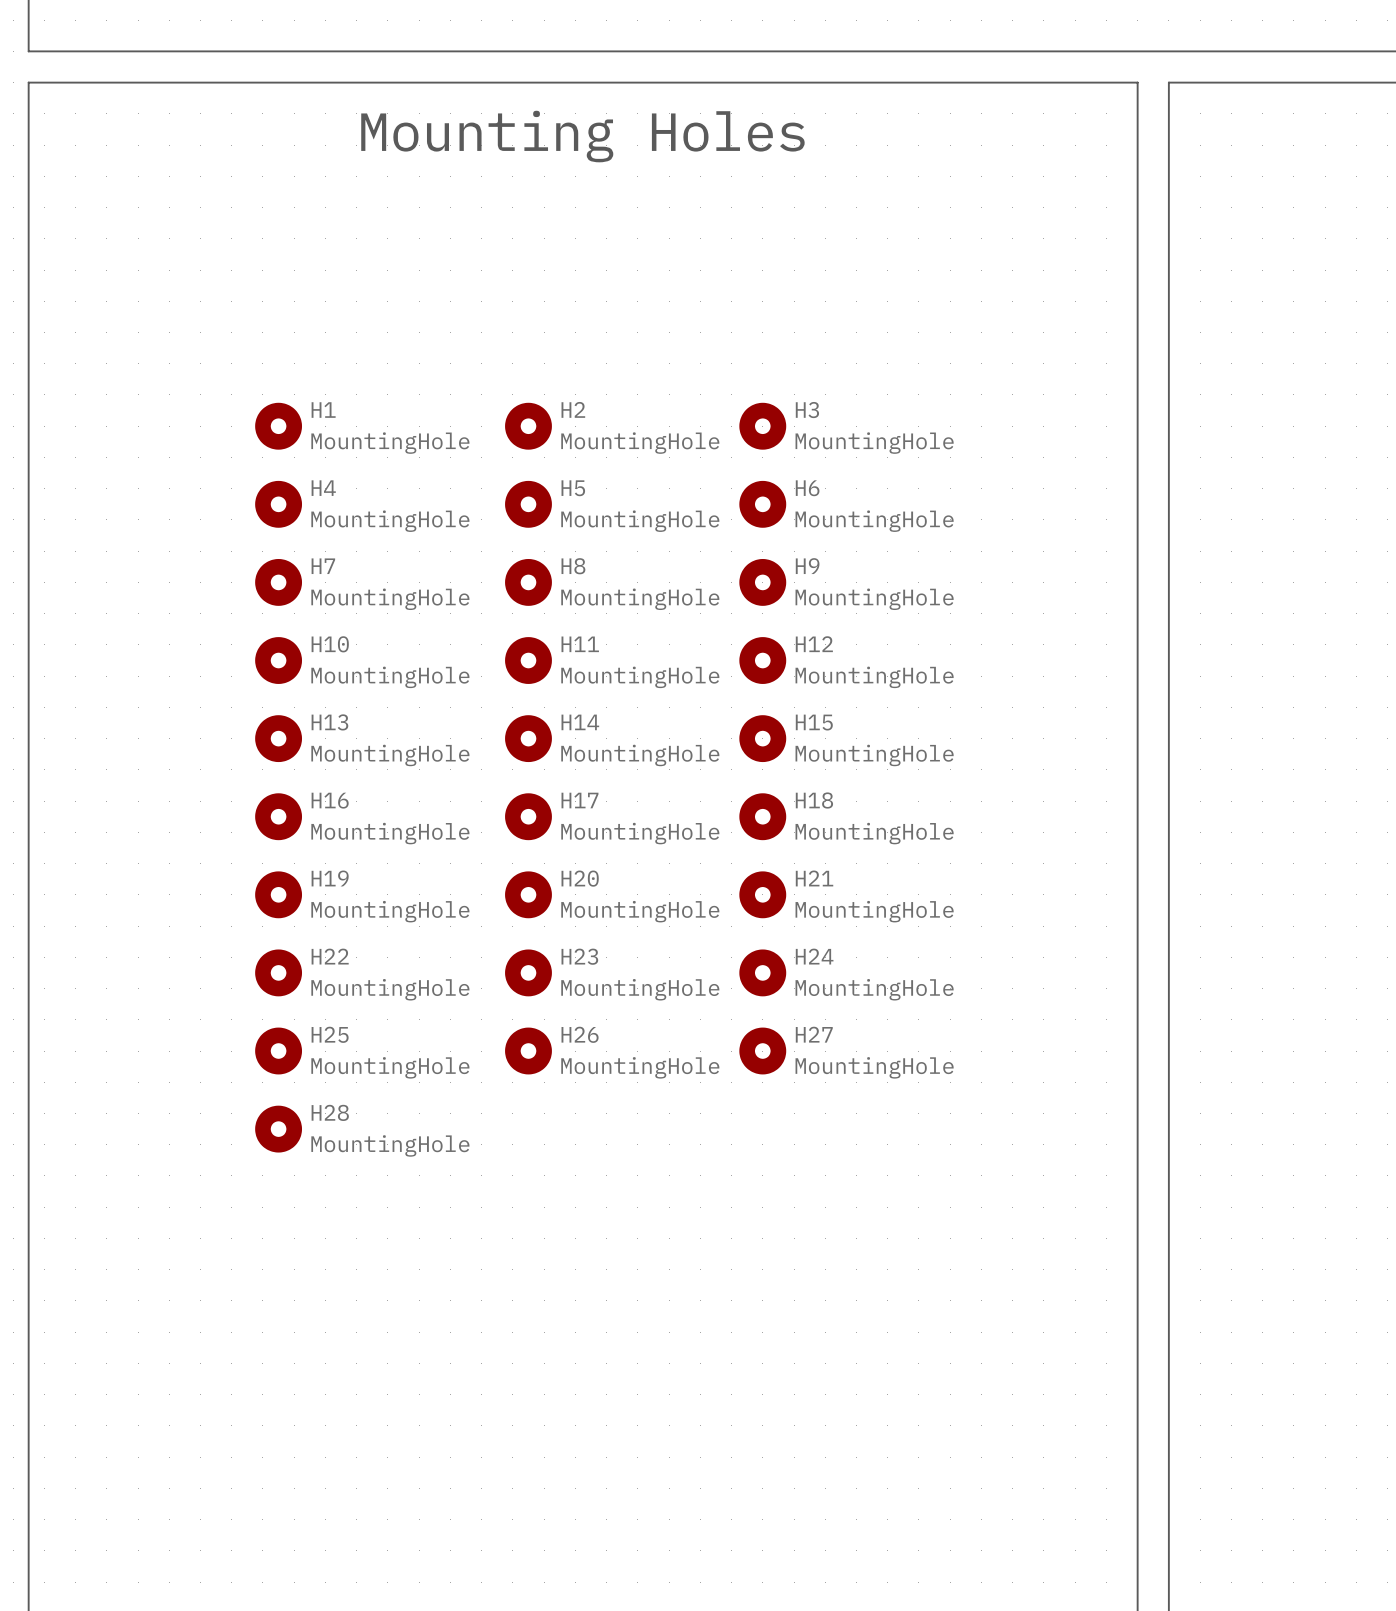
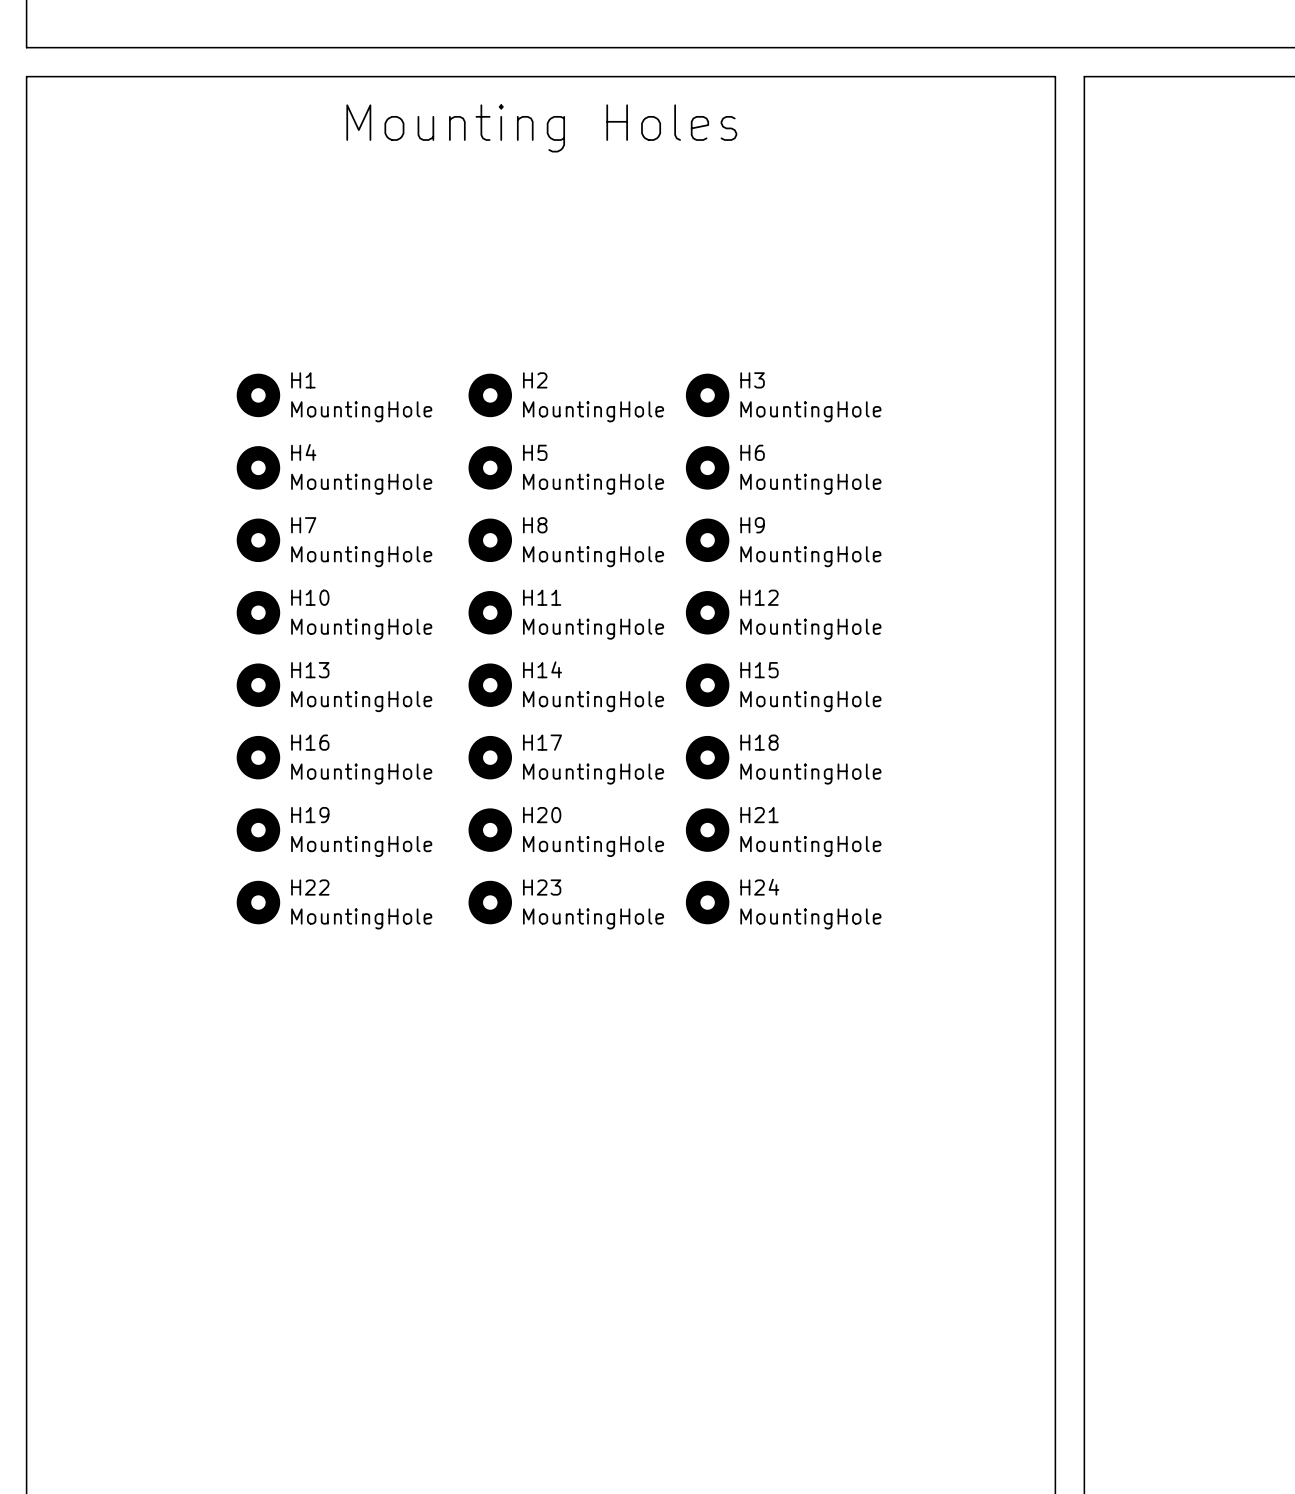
H25: MountingHole (278, 1051) -> none
H26: MountingHole (528, 1051) -> none
H27: MountingHole (762, 1051) -> none
H28: MountingHole (278, 1129) -> none

